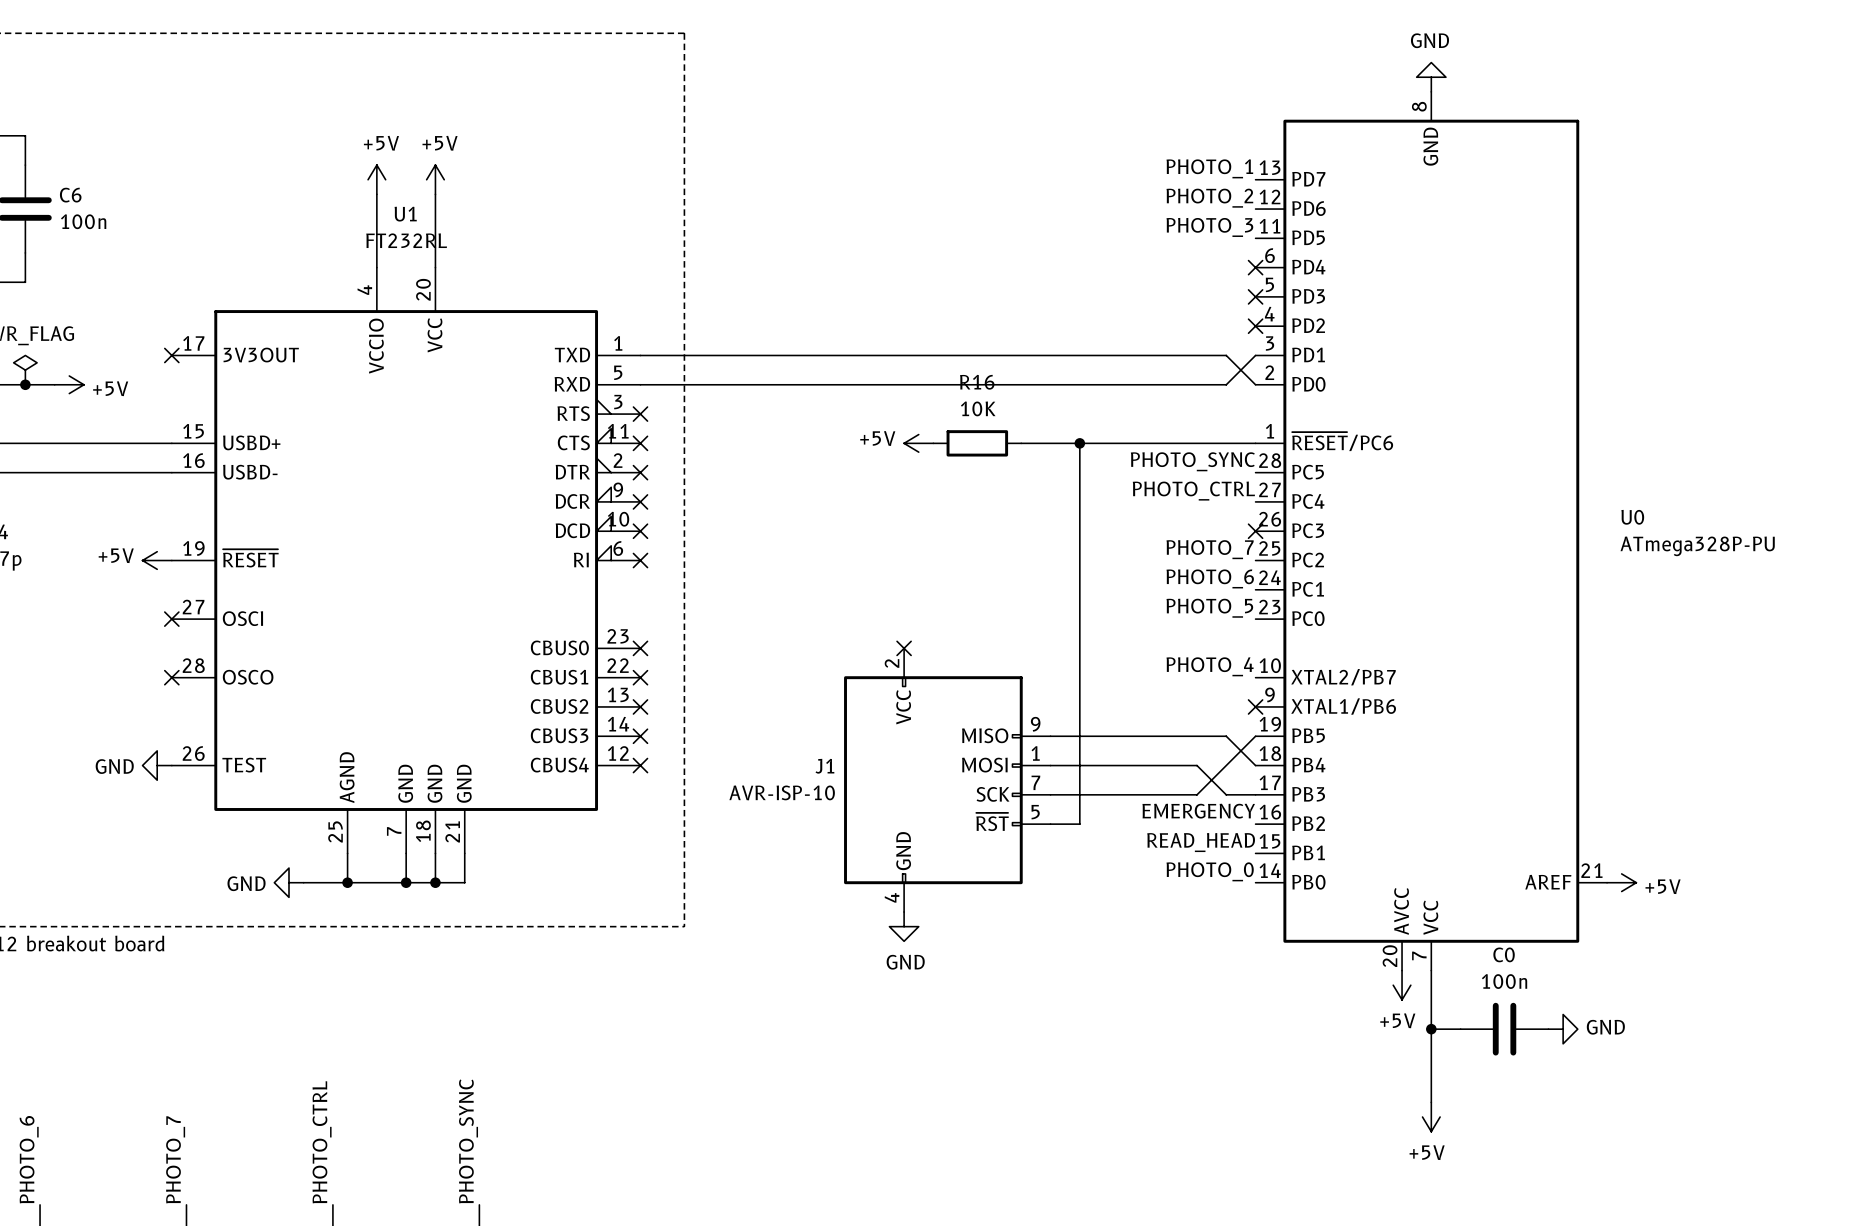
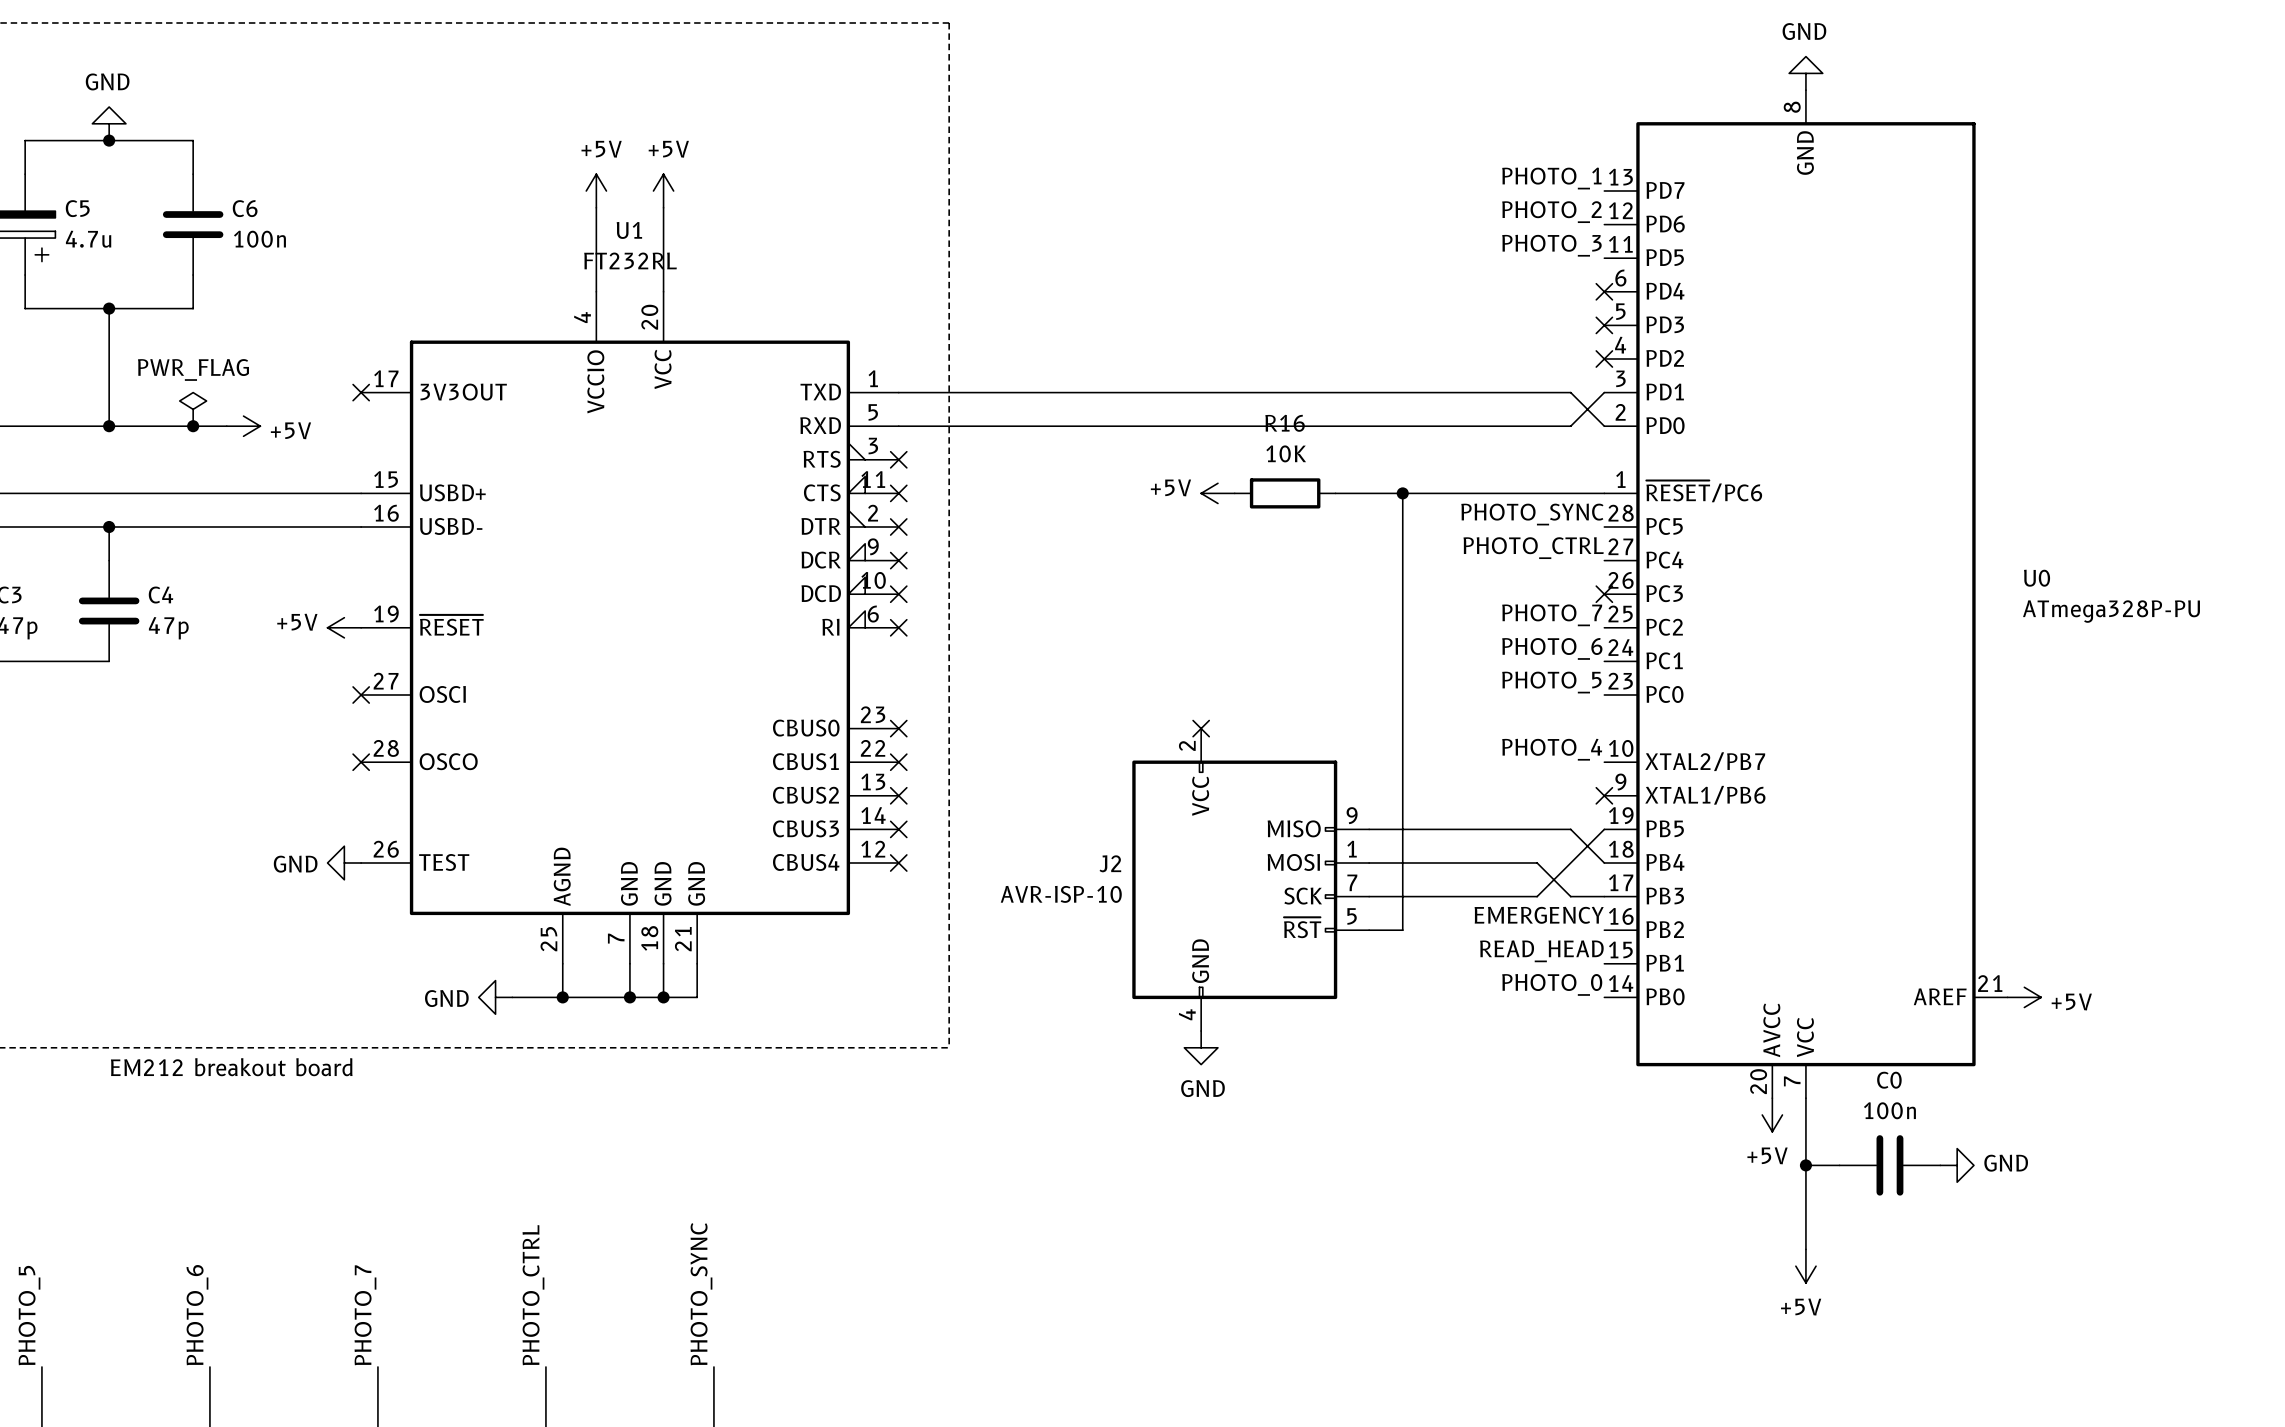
J1 name: J1 (824, 766) -> J2 (1110, 863)

